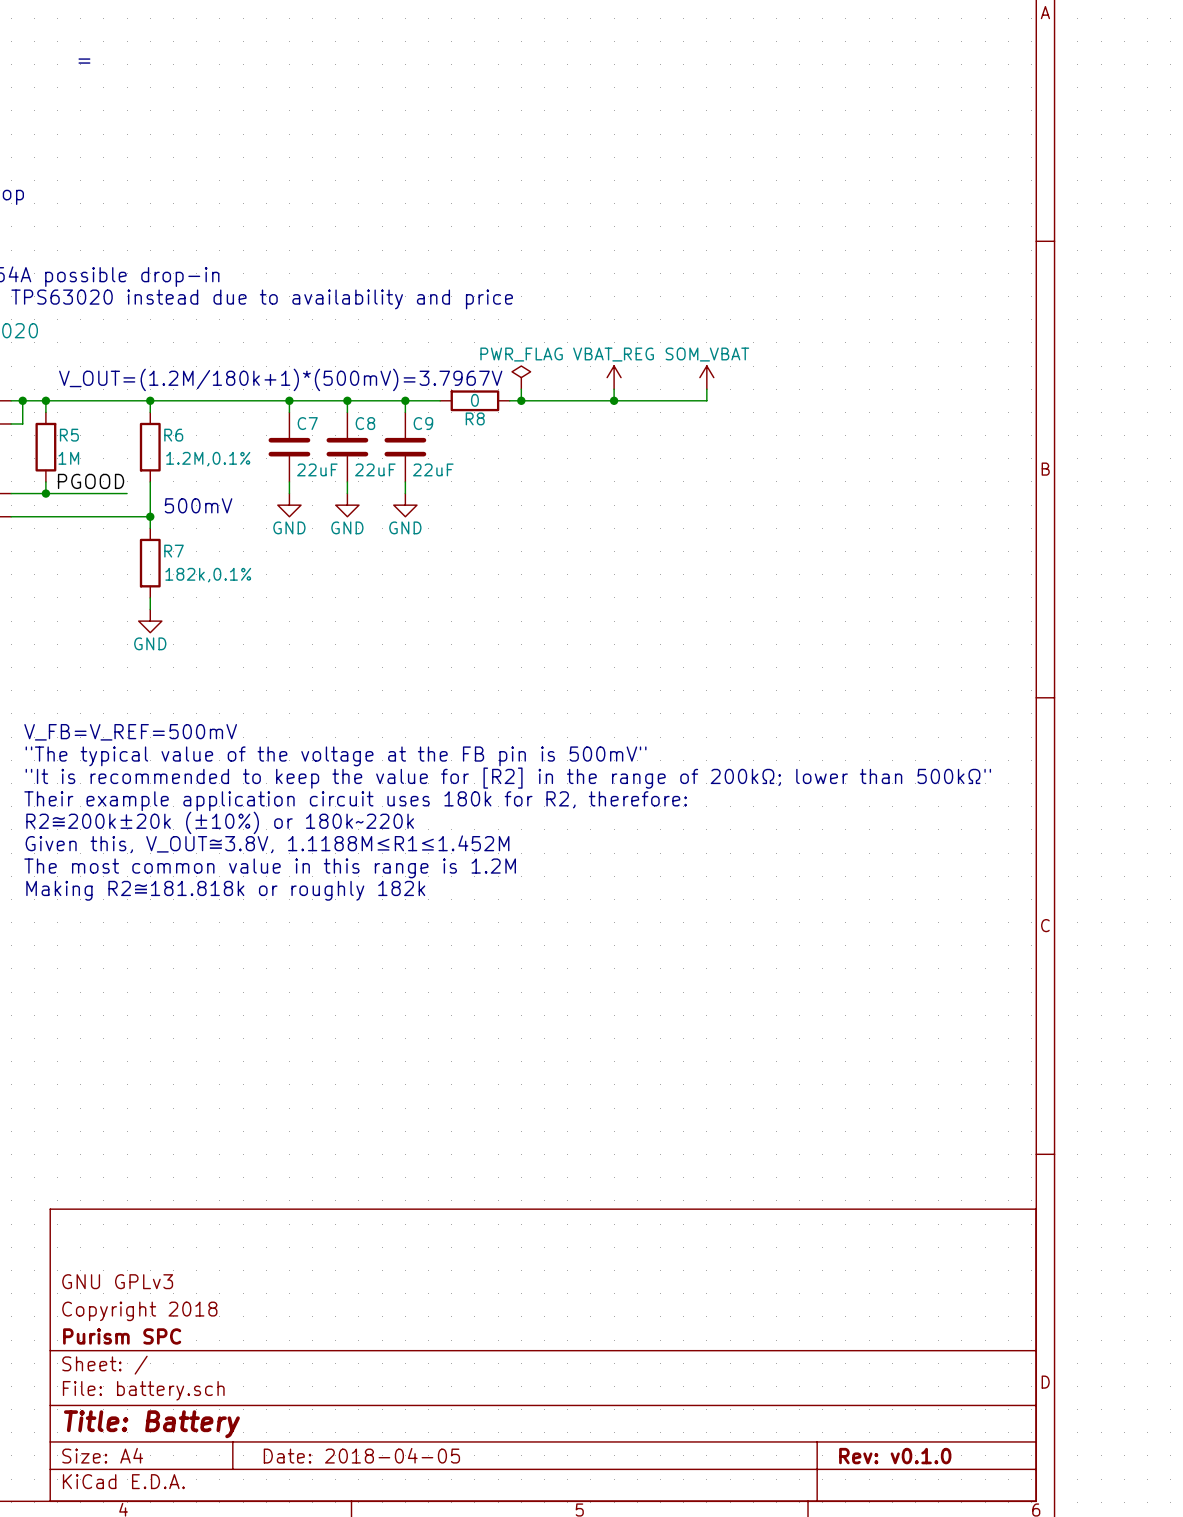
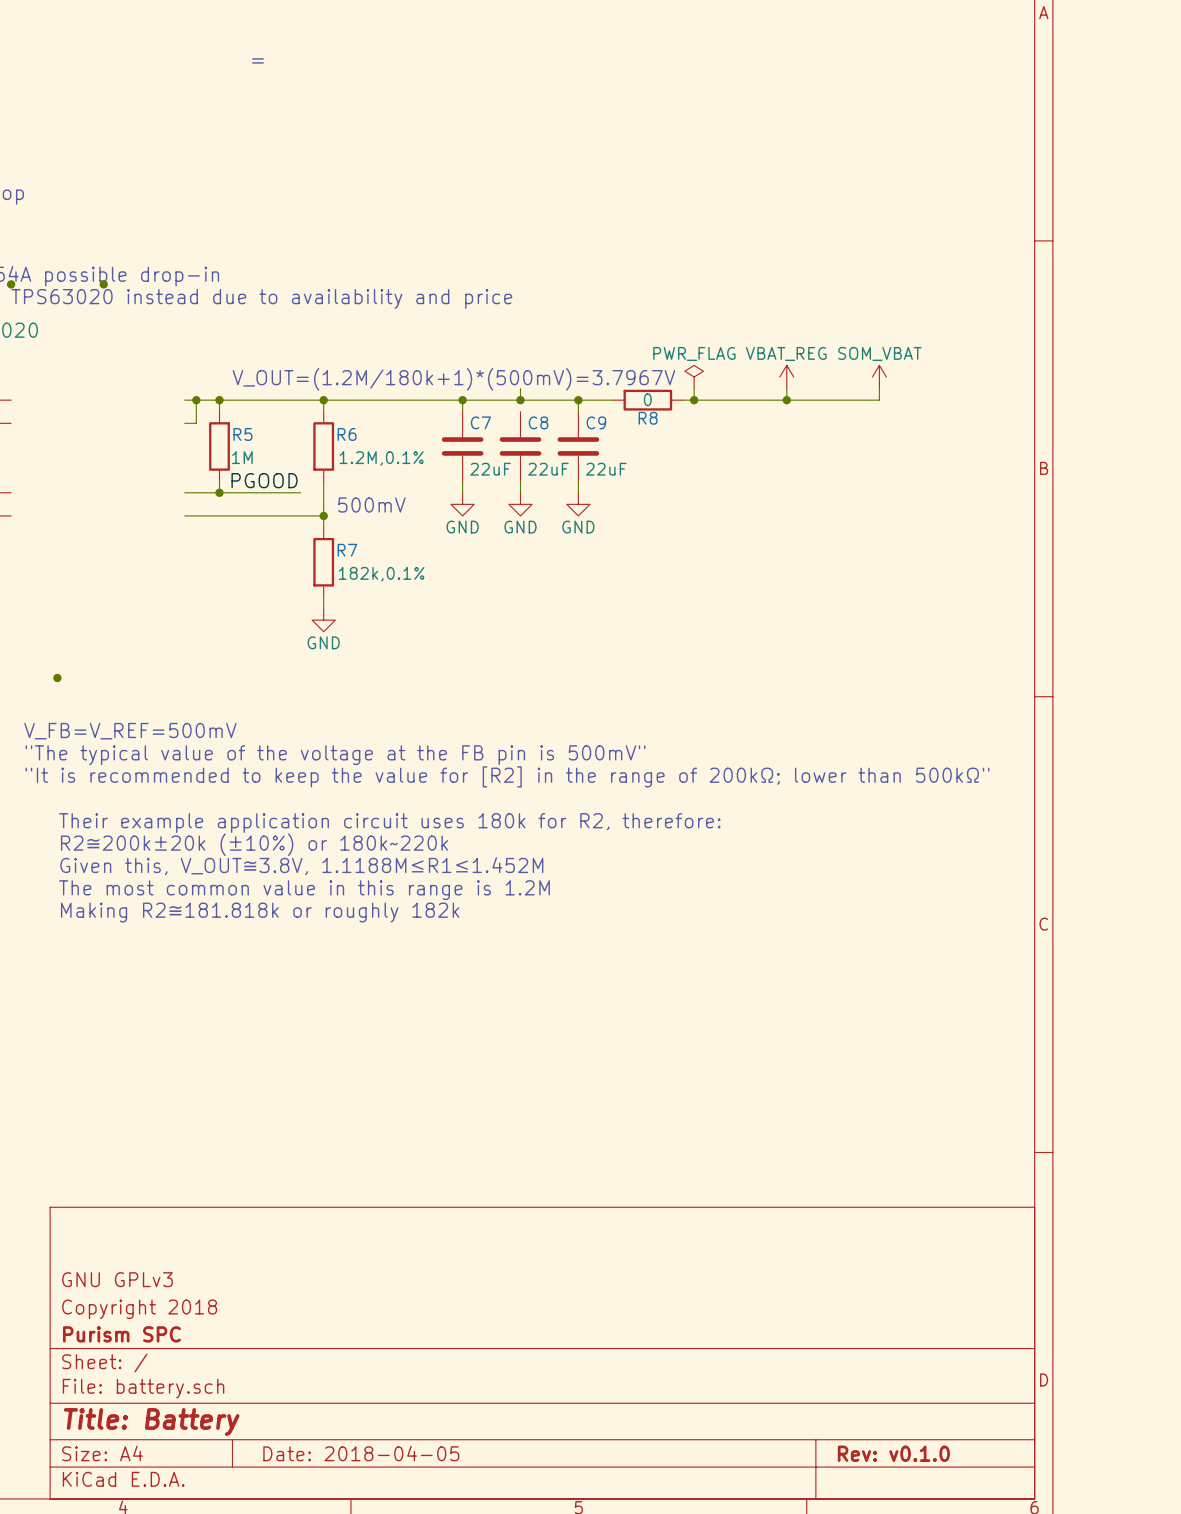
text position: = (84, 61) -> = (257, 60)
junction: none -> (11, 284)
junction: none -> (103, 284)
power symbol position: PWR_FLAG (521, 377) -> PWR_FLAG (694, 377)
power symbol position: VBAT_REG (614, 377) -> VBAT_REG (786, 377)
power symbol position: SOM_VBAT (706, 377) -> SOM_VBAT (879, 377)
text position: V_OUT=(1.2M/180k+1)*(500mV)=3.7967V (280, 379) -> V_OUT=(1.2M/180k+1)*(500mV)=3.7967V (453, 379)
wire: (614, 389) (614, 400) (683, 400) -> none
wire: none -> (694, 388) (694, 400)
wire: (706, 389) (706, 400) -> (879, 388) (879, 400) (705, 400)
wire: none -> (786, 388) (786, 400)
wire: (11, 400) (185, 400) -> none
wire: (22, 400) (22, 423) (11, 423) -> (196, 400) (196, 423) (184, 423)
junction: (22, 400) -> none
wire: (45, 400) (45, 412) -> (219, 400) (219, 411)
junction: (45, 400) -> none
wire: (150, 400) (150, 412) -> (323, 400) (323, 411)
junction: (150, 400) -> none
junction: none -> (196, 400)
junction: none -> (219, 400)
wire: (289, 400) (289, 412) -> (462, 400) (462, 411)
junction: (289, 400) -> none
junction: none -> (323, 400)
wire: (347, 400) (347, 412) -> none
junction: (347, 400) -> none
wire: (405, 400) (405, 412) -> (578, 400) (578, 411)
junction: (405, 400) -> none
wire: none -> (439, 400) (508, 400)
junction: none -> (462, 400)
R8 position: (474, 400) -> (647, 400)
junction position: (614, 400) -> (578, 400)
junction: none -> (694, 400)
junction: none -> (786, 400)
R5 position: (45, 447) -> (219, 446)
R6 position: (150, 447) -> (323, 446)
C7 position: (289, 447) -> (462, 446)
C8 position: (347, 447) -> (520, 446)
C9 position: (405, 447) -> (578, 446)
wire: (45, 481) (45, 493) -> (219, 481) (219, 492)
label position: PGOOD (91, 481) -> PGOOD (264, 480)
wire: (150, 481) (150, 528) -> (323, 481) (323, 527)
wire: (289, 481) (289, 493) -> (462, 481) (462, 492)
wire: (347, 481) (347, 493) -> (520, 481) (520, 492)
wire: (405, 481) (405, 493) -> (578, 481) (578, 492)
wire: (11, 493) (127, 493) -> (184, 492) (300, 492)
junction: (45, 493) -> none
junction: none -> (219, 492)
text position: 500mV (198, 505) -> 500mV (371, 505)
power symbol: GND (289, 505) -> none
power symbol: GND (347, 505) -> none
power symbol: GND (405, 505) -> none
power symbol: none -> GND (462, 504)
power symbol: none -> GND (520, 504)
power symbol: none -> GND (578, 504)
wire: (11, 516) (150, 516) -> (184, 515) (323, 515)
junction: (150, 516) -> none
junction: none -> (323, 515)
R7 position: (150, 563) -> (323, 562)
wire: (150, 597) (150, 609) -> (323, 596) (323, 608)
power symbol: GND (150, 621) -> none
power symbol: none -> GND (323, 620)
junction: none -> (57, 678)
text position: Their example application circuit uses 180k for R2, therefore: (355, 801) -> Their example application circuit uses 180k for R2, therefore: (389, 823)
text position: R2≅200k±20k (±10%) or 180k~220k (220, 822) -> R2≅200k±20k (±10%) or 180k~220k (254, 844)
text position: Given this, V_OUT≅3.8V, 1.1188M≤R1≤1.452M (267, 844) -> Given this, V_OUT≅3.8V, 1.1188M≤R1≤1.452M (301, 866)
text position: The most common value in this range is 1.2M (270, 868) -> The most common value in this range is 1.2M (304, 890)
text position: Making R2≅181.818k or roughly 182k (225, 890) -> Making R2≅181.818k or roughly 182k (260, 912)

